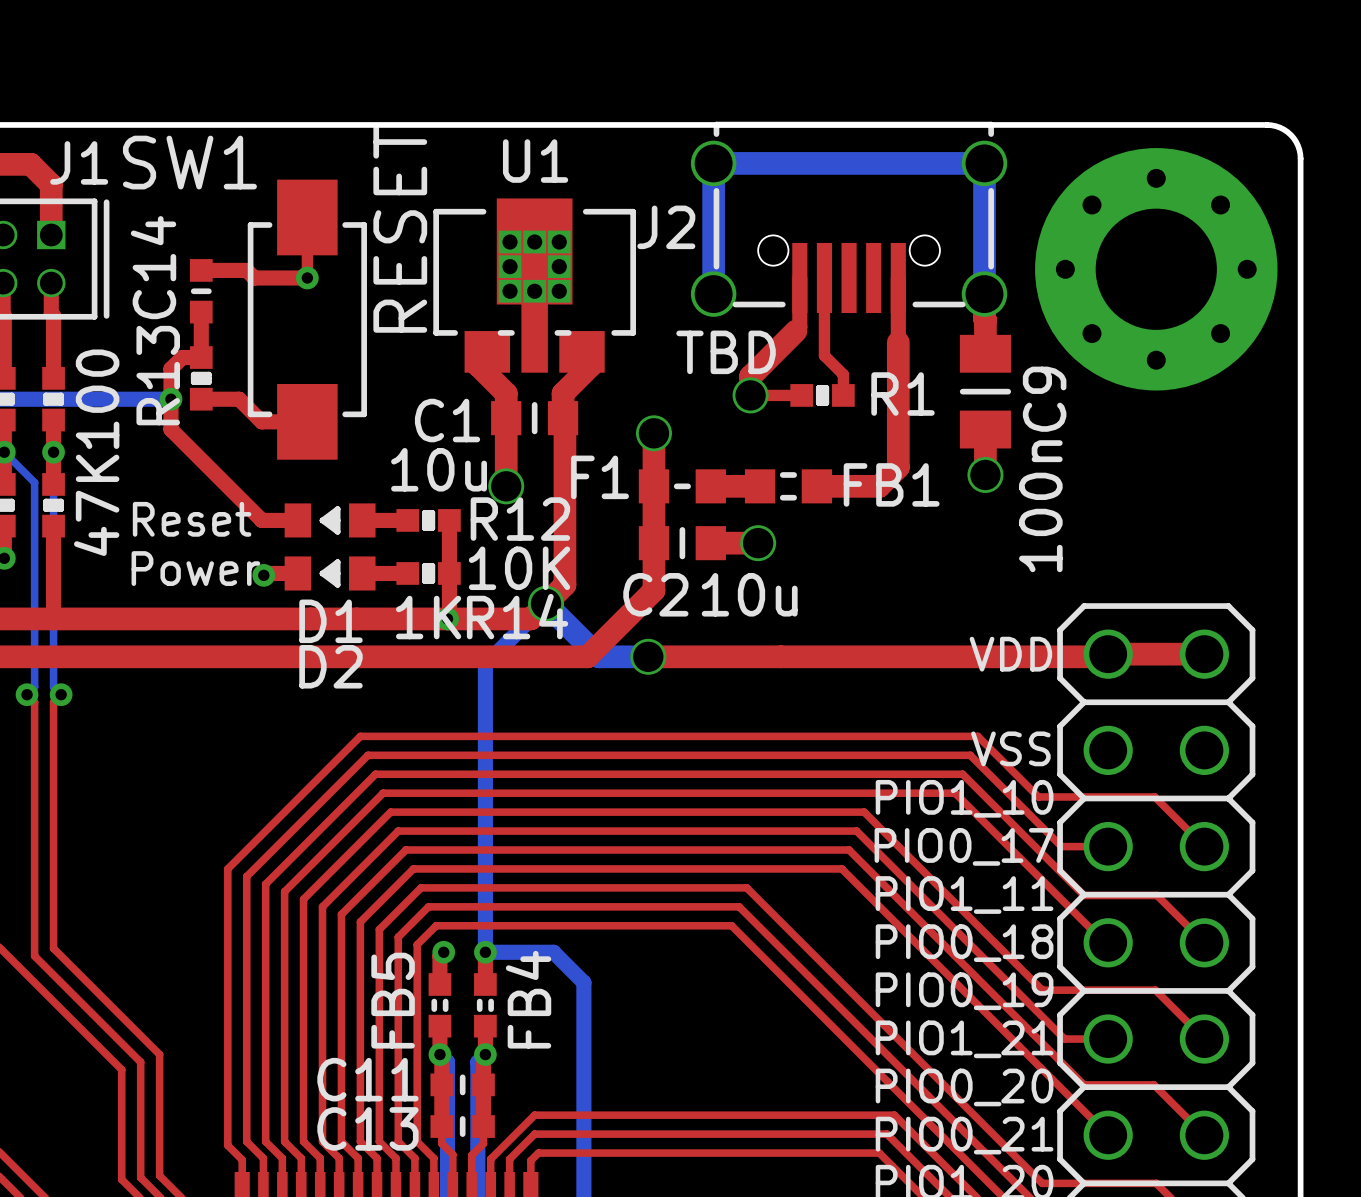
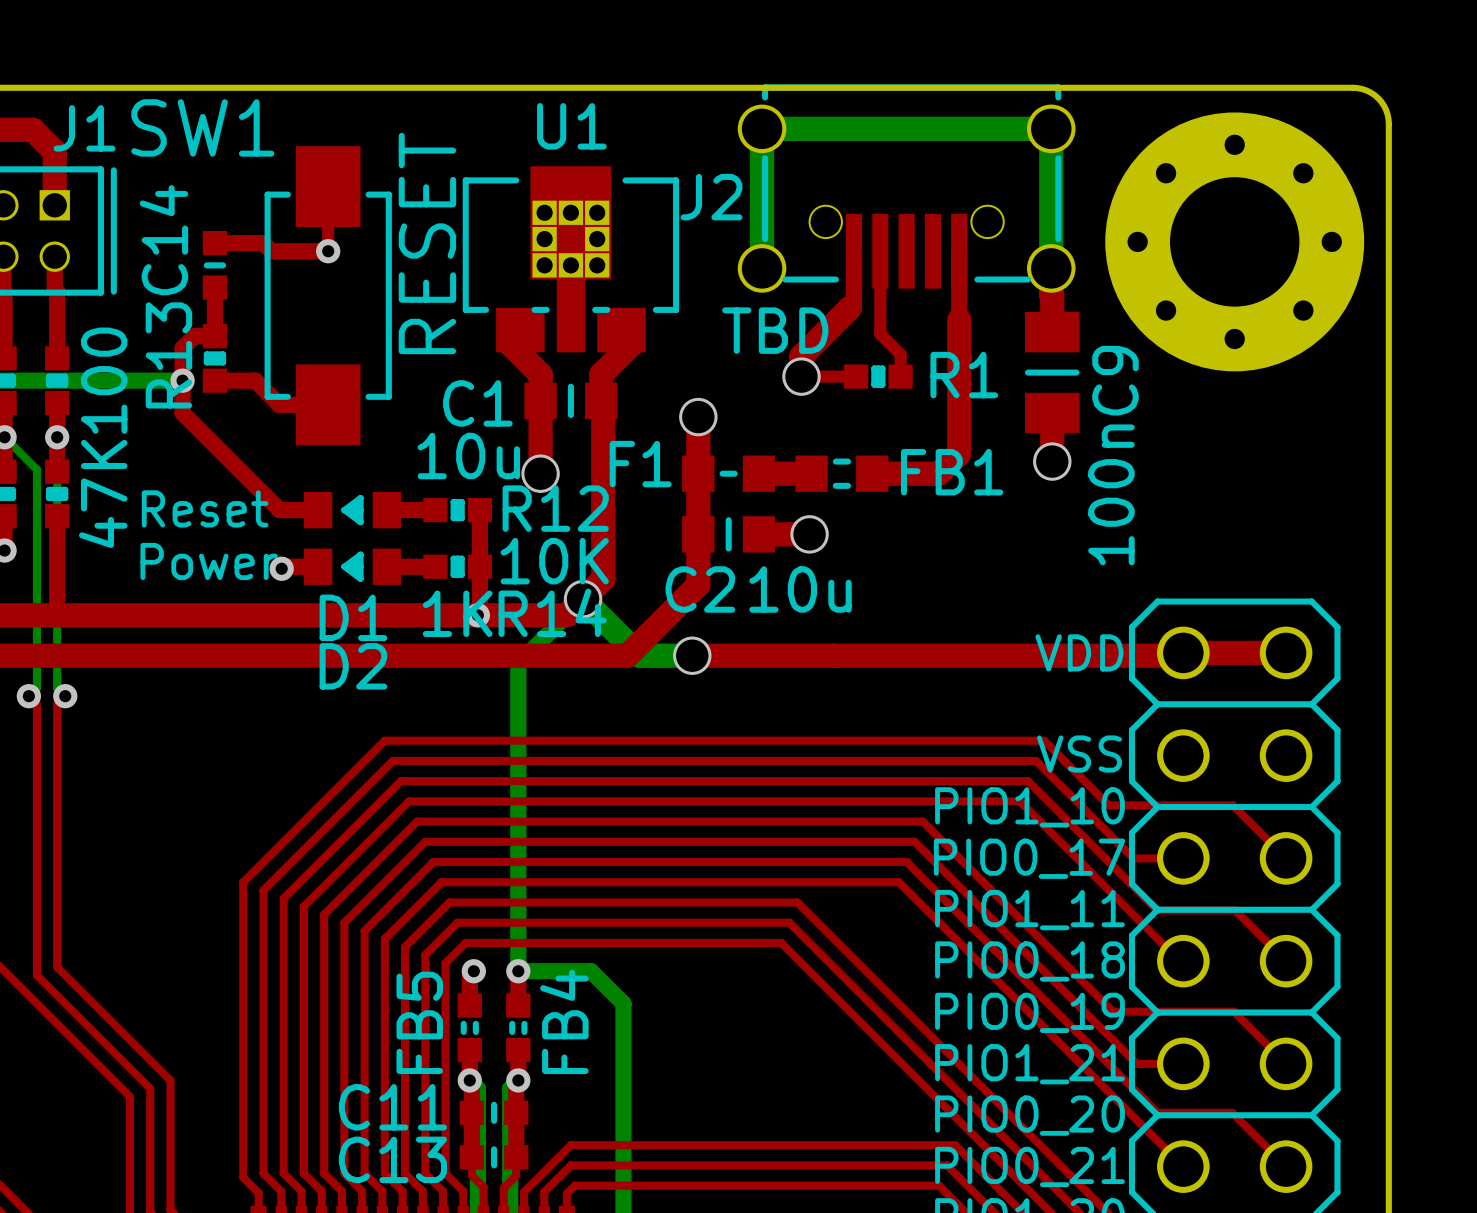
SW1 value position: RESET (400, 229) -> RESET (427, 243)

